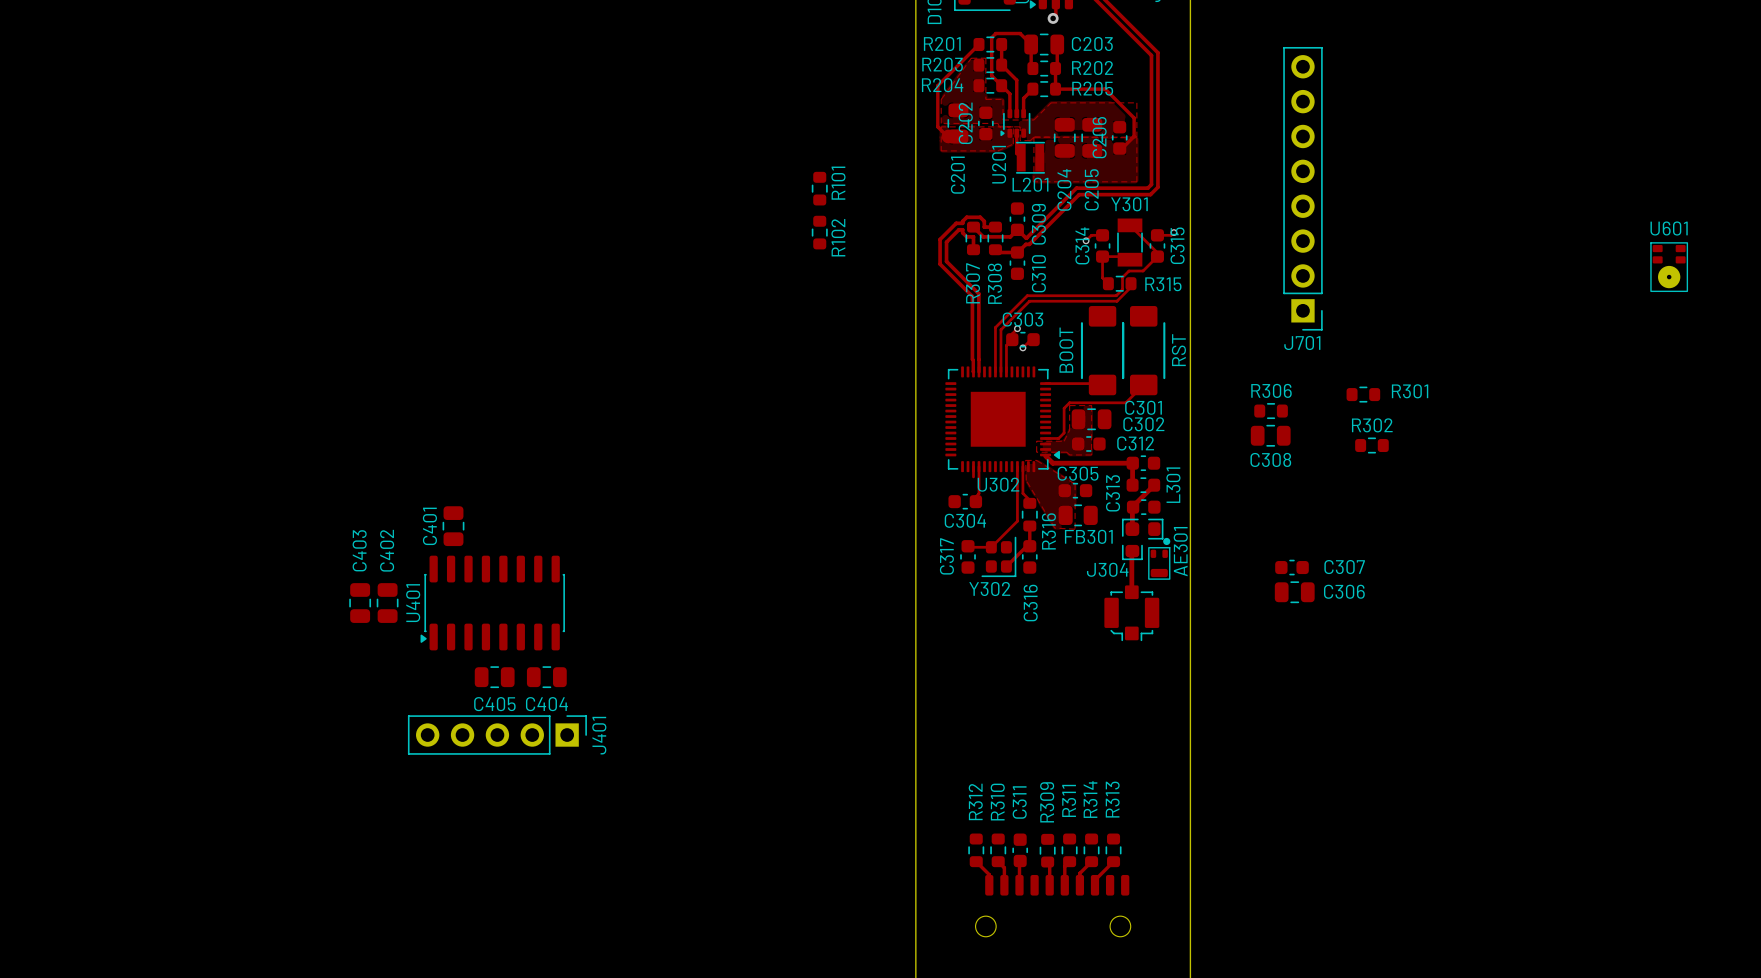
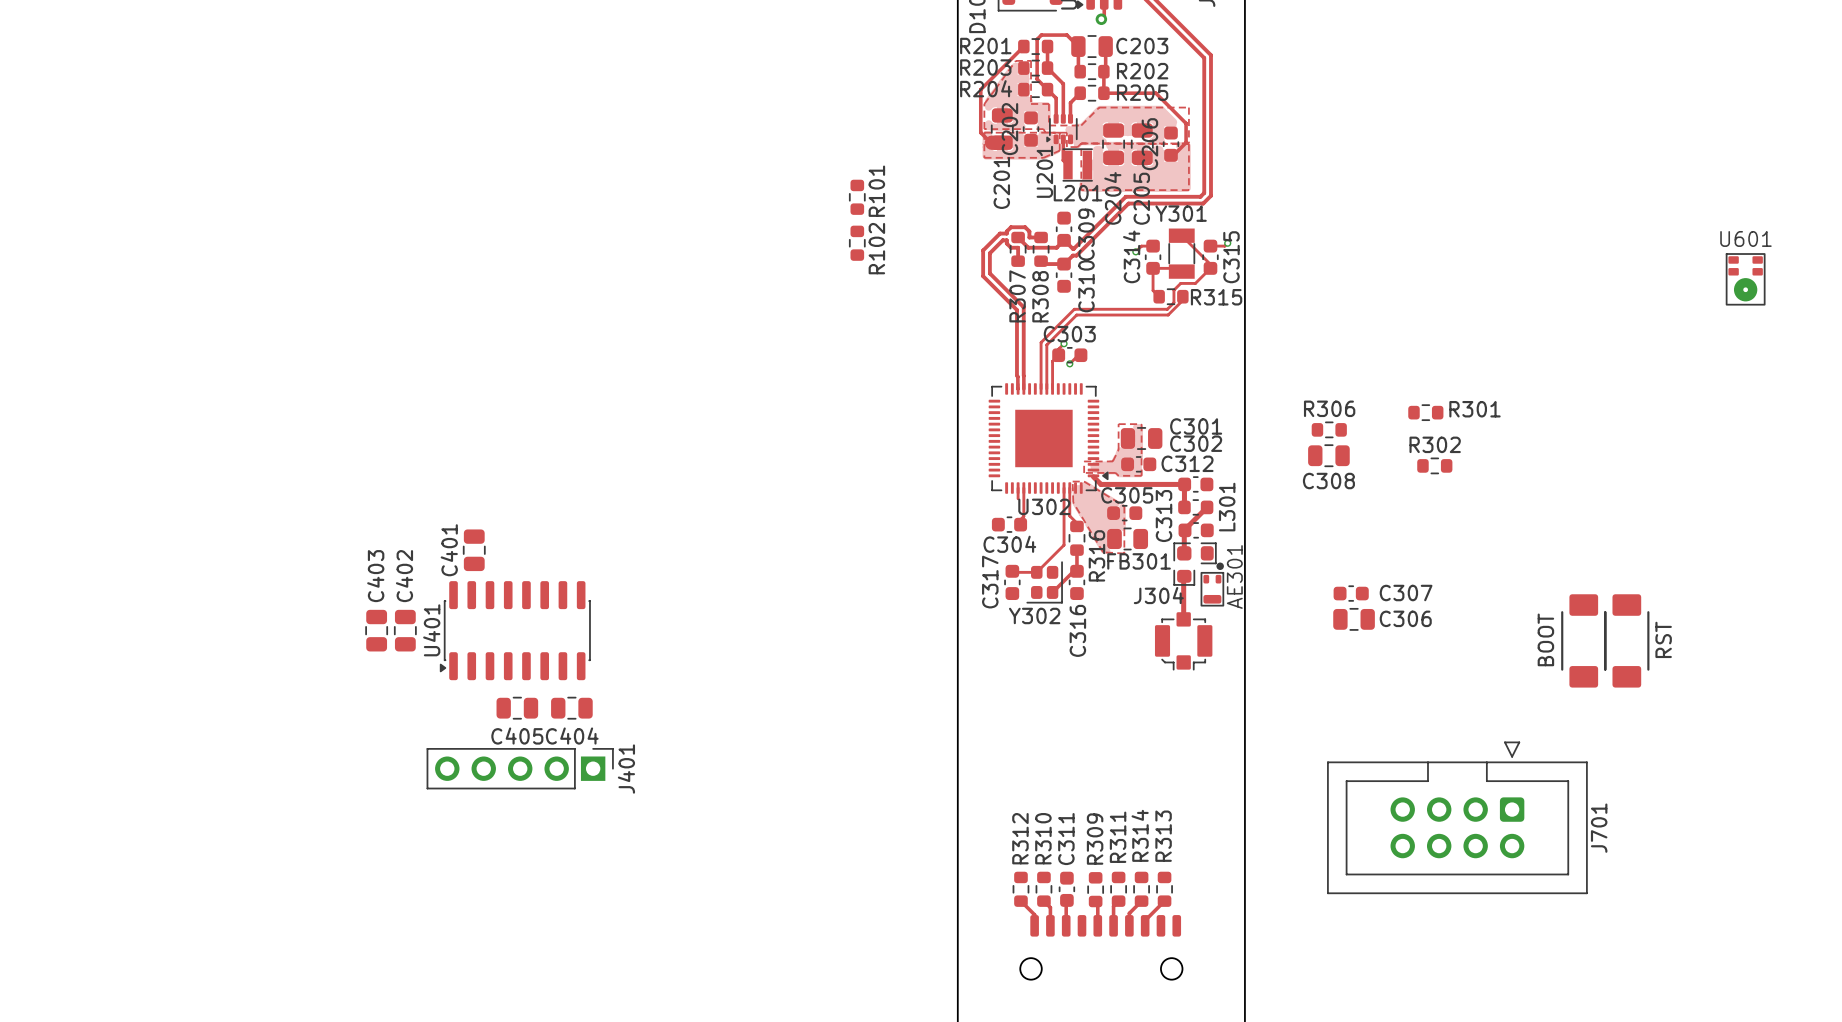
J701 footprint: [1283, 46, 1323, 331] -> [1327, 741, 1588, 895]
J701 name position: J701 (1302, 343) -> J701 (1599, 828)
part: BOOT (1102, 350) -> none
part: RST (1143, 350) -> none
track: (1045, 383) (1102, 384) -> none
track: (1143, 384) (1125, 402) (1069, 402) (1064, 408) (1064, 433) (1058, 438) (1045, 438) -> none
part: none -> BOOT (1583, 640)
part: none -> RST (1626, 640)

